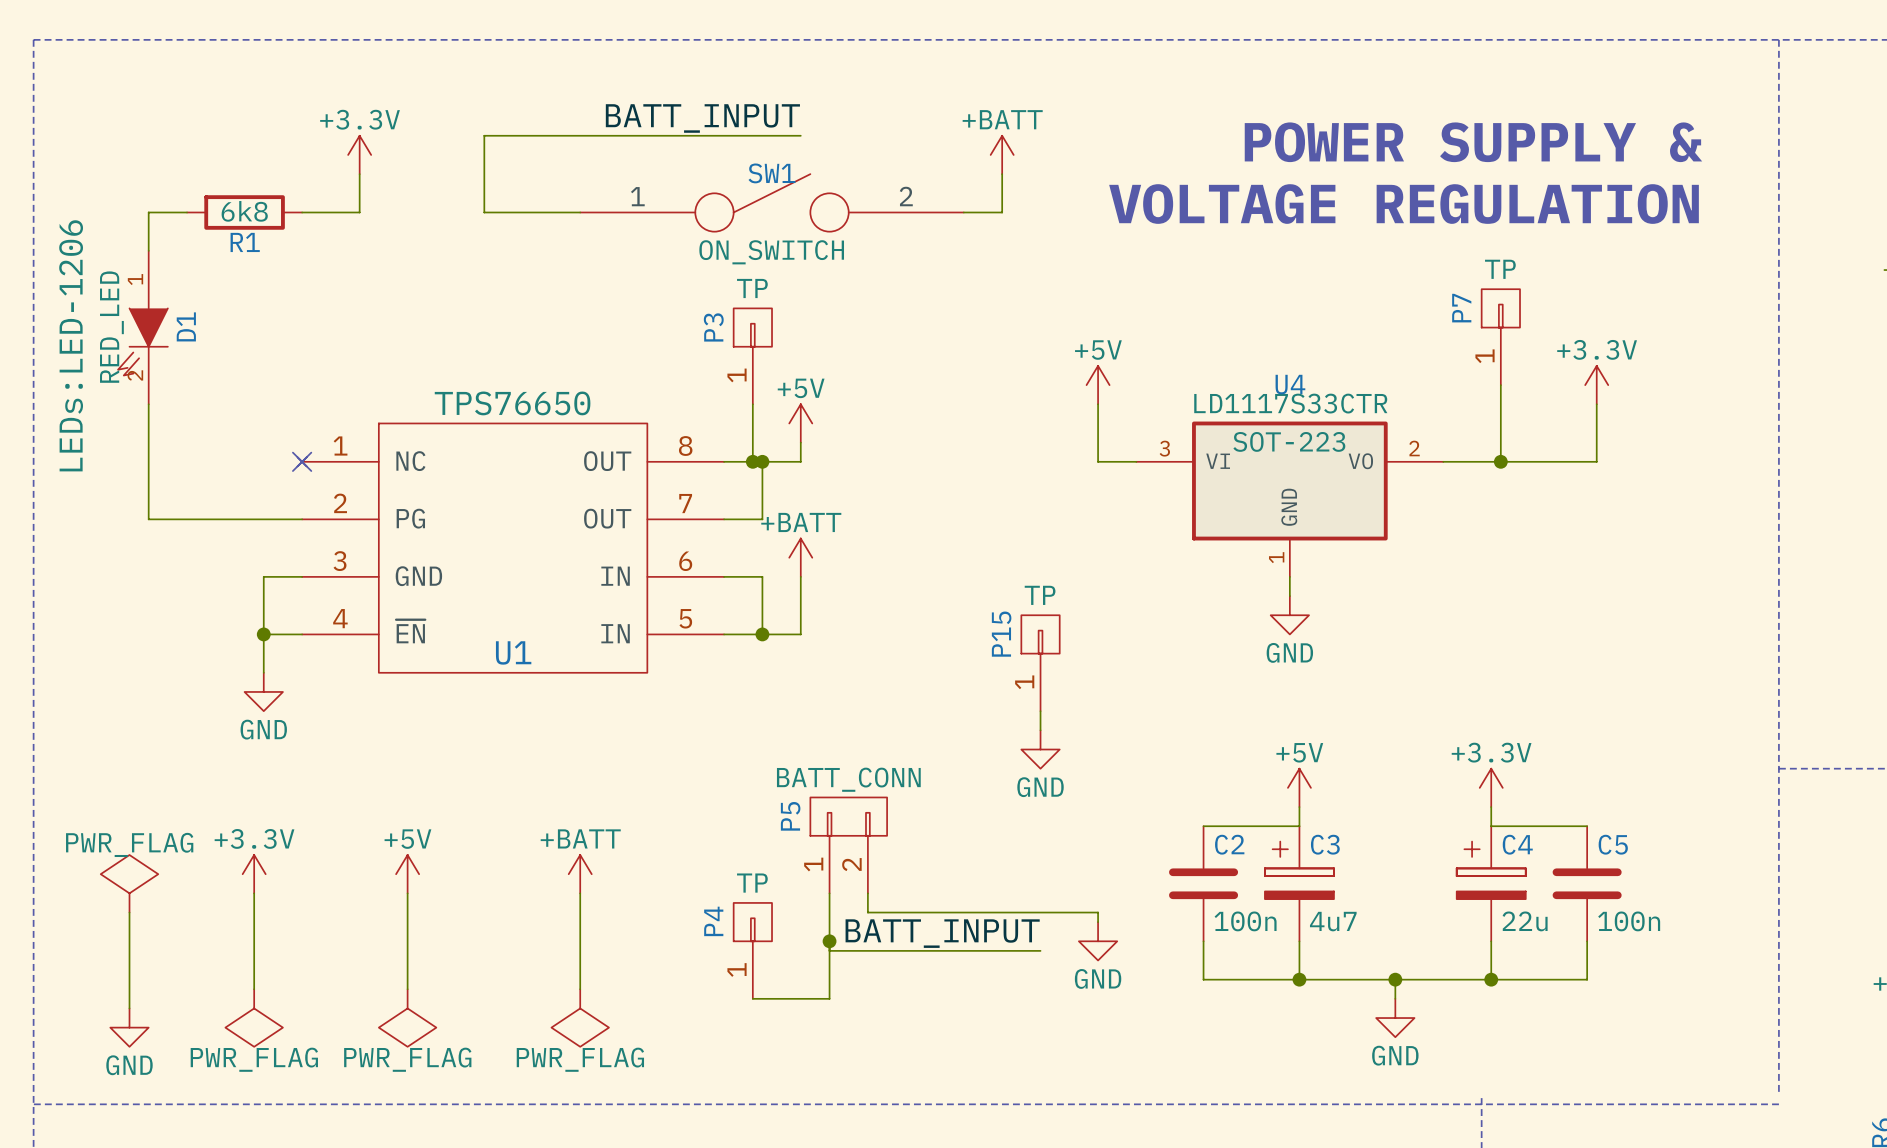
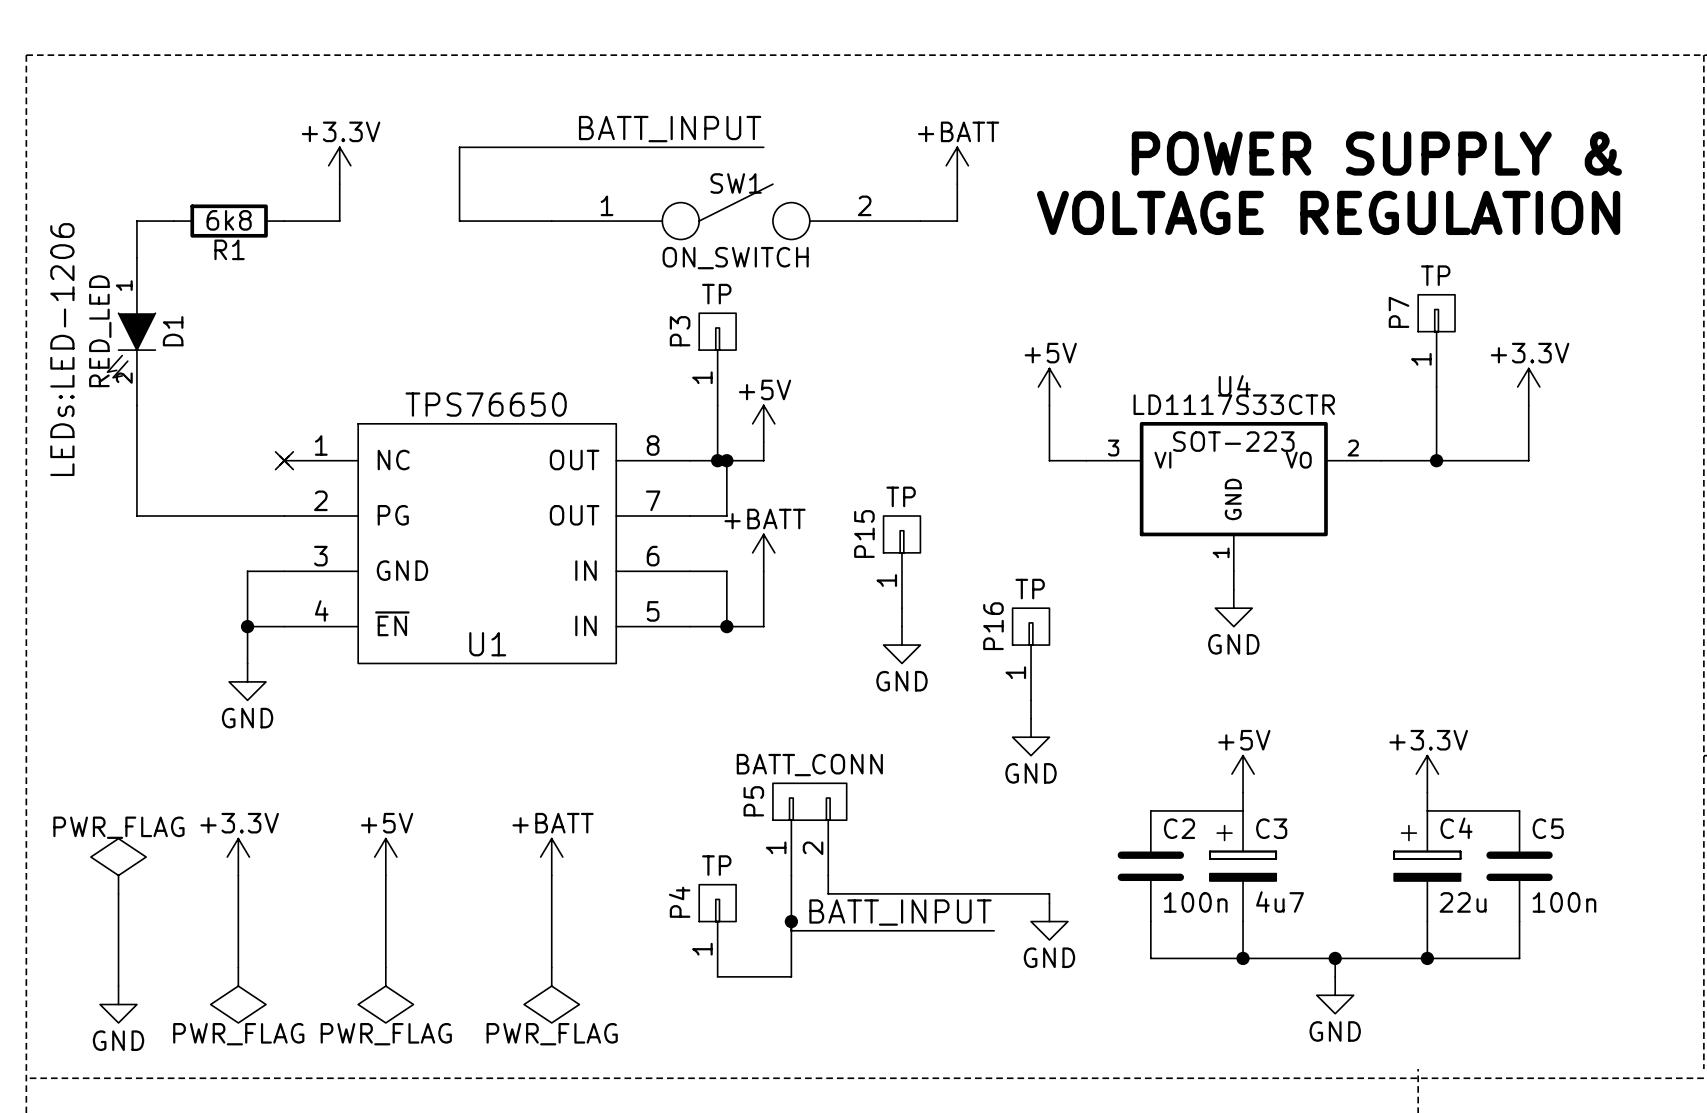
wire: none -> (901, 608) (901, 626)
power symbol: none -> GND (901, 645)
P15 position: (1040, 663) -> (901, 562)
P16: none -> TP (1031, 654)
wire: (1040, 711) (1040, 730) -> (1031, 700) (1031, 718)
power symbol position: GND (1040, 749) -> GND (1031, 737)

